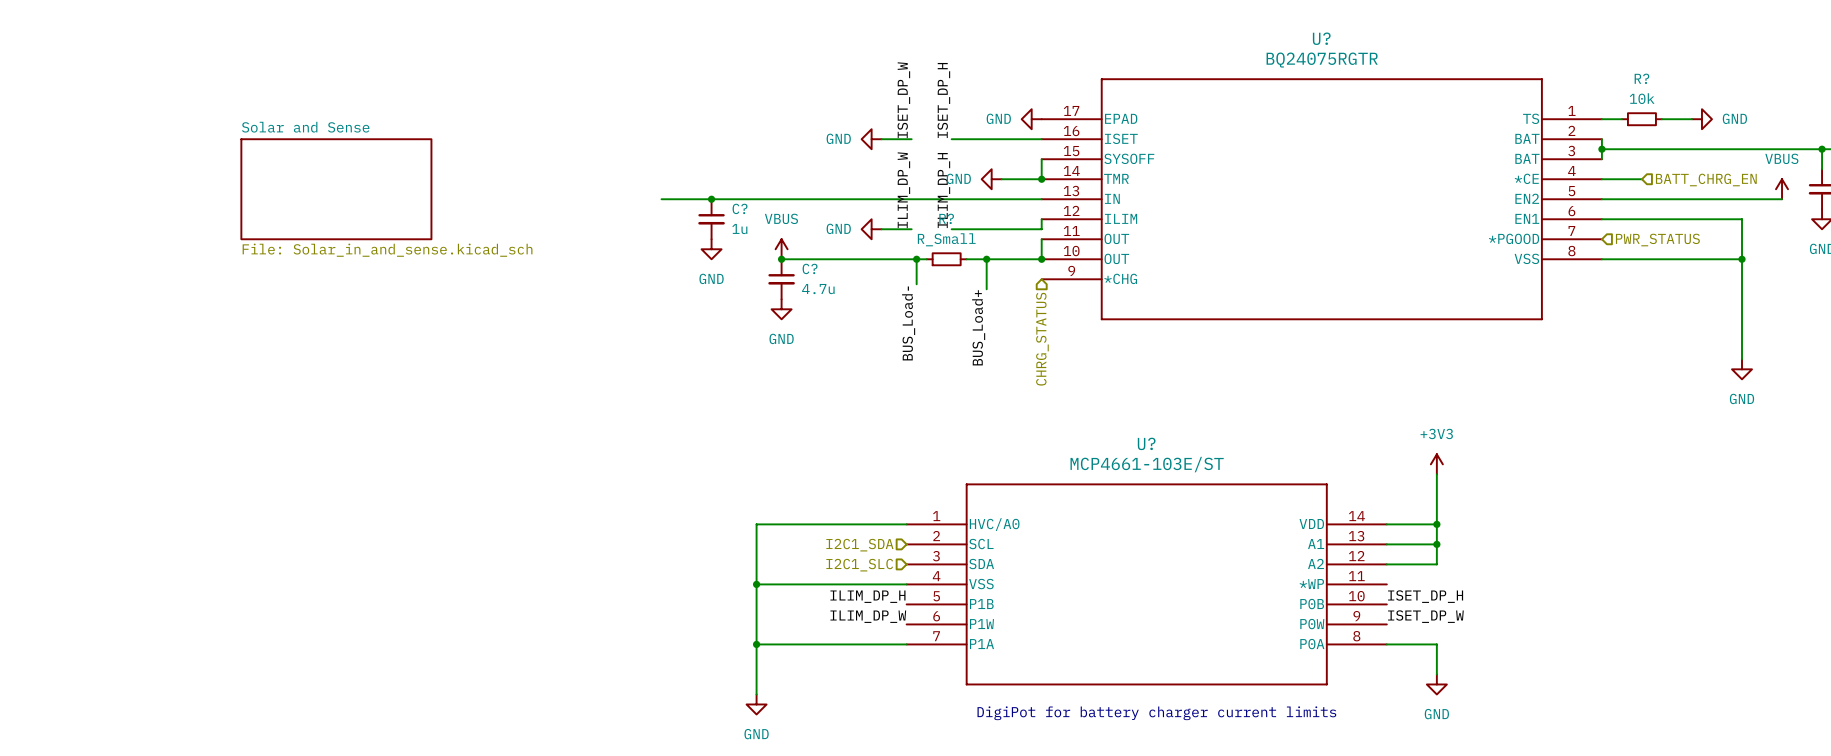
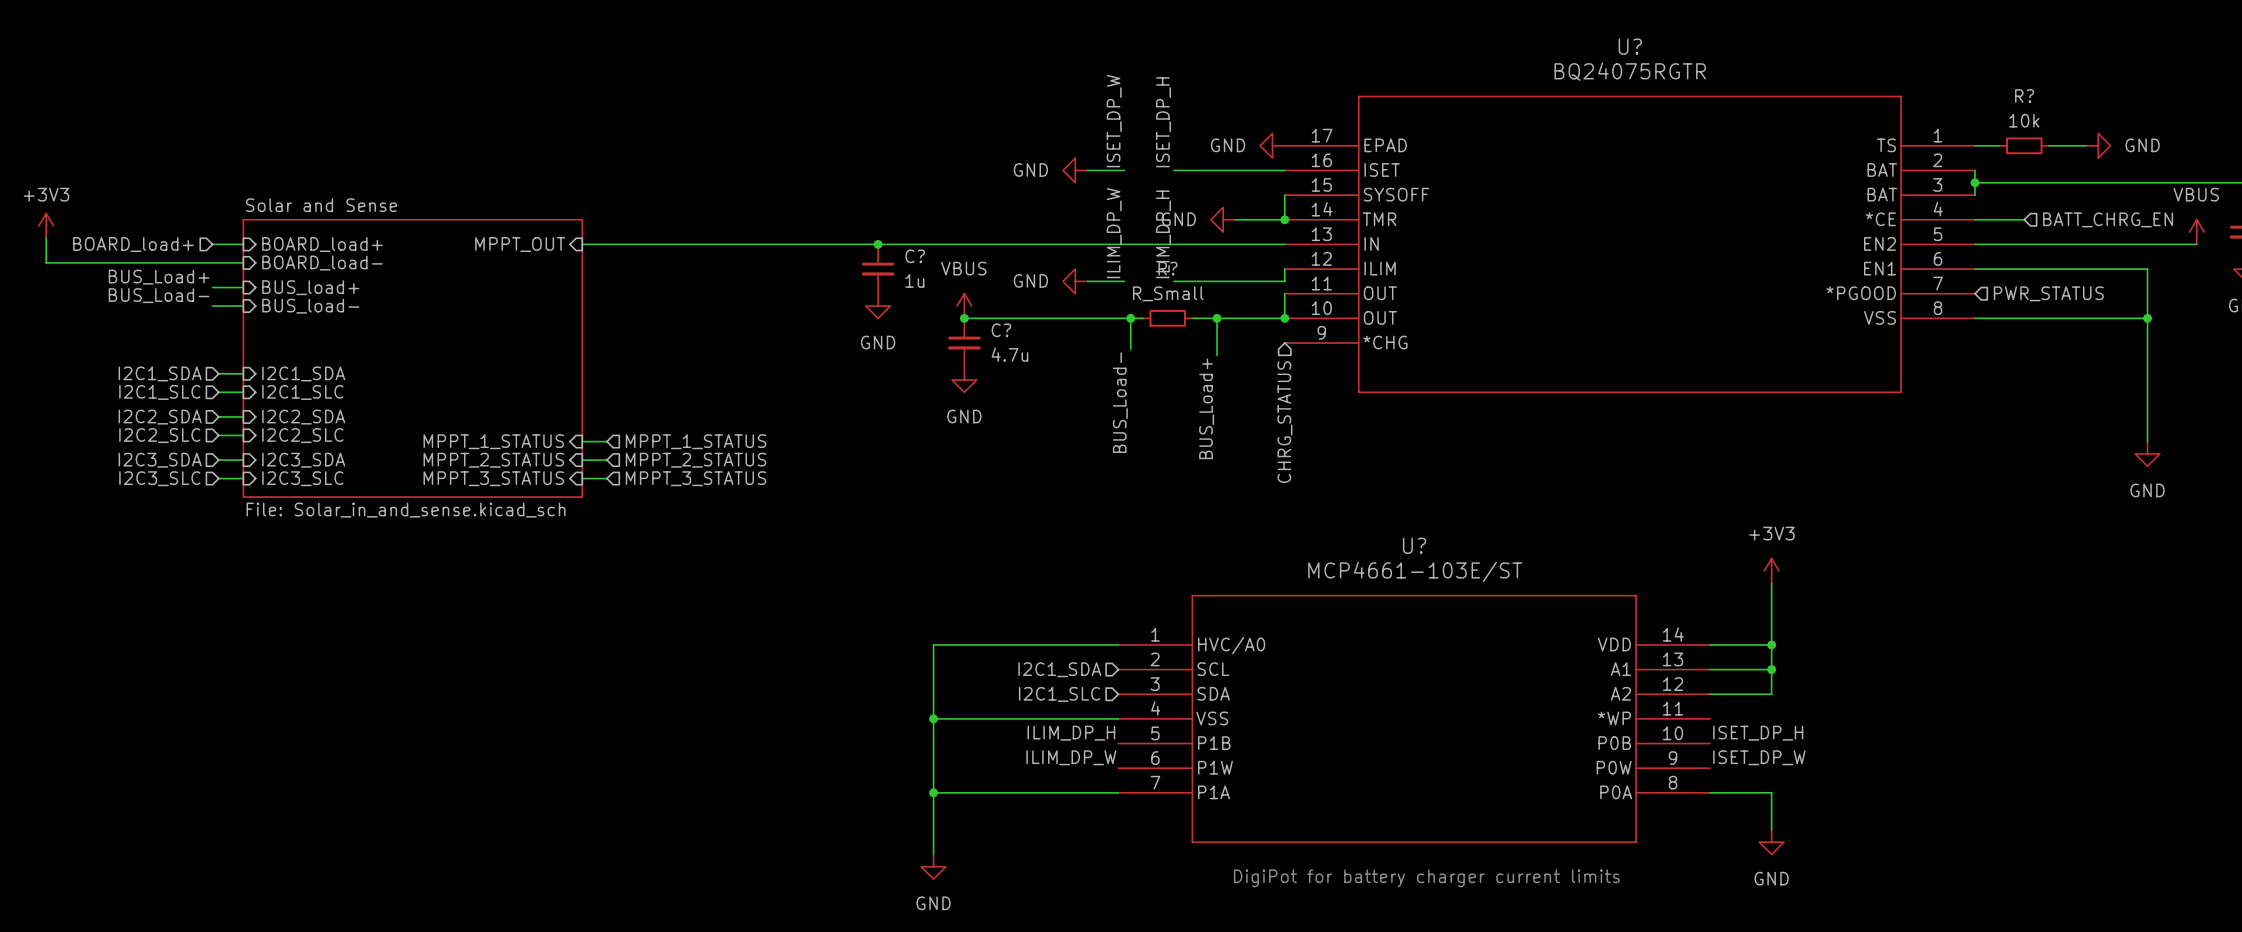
power symbol: none -> +3V3 (46, 225)
sheet Solar and Sense: File: Solar_in_and_sense.kicad_sch (336, 189) -> none
wire: none -> (46, 238) (46, 262) (243, 262)
hierarchical label: none -> BOARD_load+ (133, 244)
wire: none -> (212, 244) (243, 244)
sheet pin: none -> BOARD_load+ (322, 244)
wire: none -> (582, 244) (816, 244)
sheet pin: none -> MPPT_OUT (520, 244)
sheet pin: none -> BOARD_load- (322, 263)
label: none -> BUS_Load+ (159, 277)
wire: none -> (212, 287) (243, 287)
sheet pin: none -> BUS_load+ (310, 287)
label: none -> BUS_Load- (159, 295)
wire: none -> (212, 306) (243, 306)
sheet pin: none -> BUS_load- (310, 306)
sheet Solar and Sense: none -> File: Solar_in_and_sense.kicad_sch (412, 358)
wire: none -> (218, 373) (243, 373)
hierarchical label: none -> I2C1_SDA (160, 373)
sheet pin: none -> I2C1_SDA (303, 373)
wire: none -> (218, 392) (243, 392)
hierarchical label: none -> I2C1_SLC (159, 392)
sheet pin: none -> I2C1_SLC (302, 392)
wire: none -> (218, 416) (243, 416)
hierarchical label: none -> I2C2_SDA (160, 417)
sheet pin: none -> I2C2_SDA (303, 417)
wire: none -> (218, 435) (243, 435)
hierarchical label: none -> I2C2_SLC (159, 435)
sheet pin: none -> I2C2_SLC (302, 435)
wire: none -> (582, 441) (606, 441)
sheet pin: none -> MPPT_1_STATUS (493, 441)
hierarchical label: none -> MPPT_1_STATUS (696, 441)
wire: none -> (218, 460) (243, 460)
wire: none -> (582, 460) (606, 460)
hierarchical label: none -> I2C3_SDA (160, 460)
sheet pin: none -> I2C3_SDA (303, 460)
sheet pin: none -> MPPT_2_STATUS (493, 460)
hierarchical label: none -> MPPT_2_STATUS (696, 460)
wire: none -> (218, 478) (243, 478)
wire: none -> (582, 478) (606, 478)
hierarchical label: none -> I2C3_SLC (159, 478)
sheet pin: none -> I2C3_SLC (302, 478)
sheet pin: none -> MPPT_3_STATUS (493, 478)
hierarchical label: none -> MPPT_3_STATUS (696, 478)

